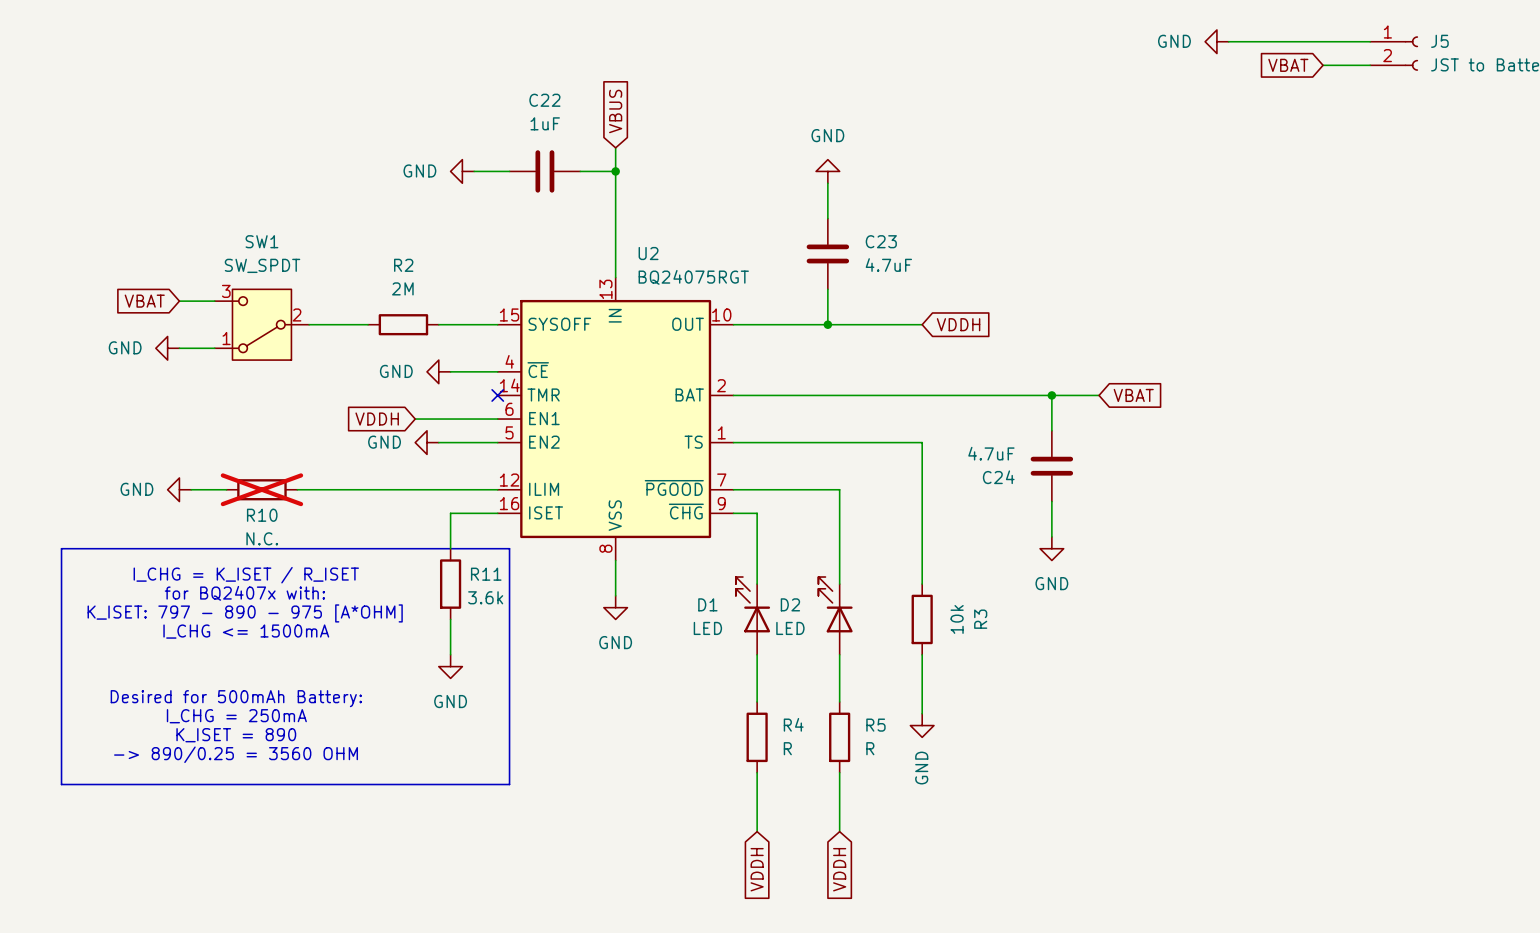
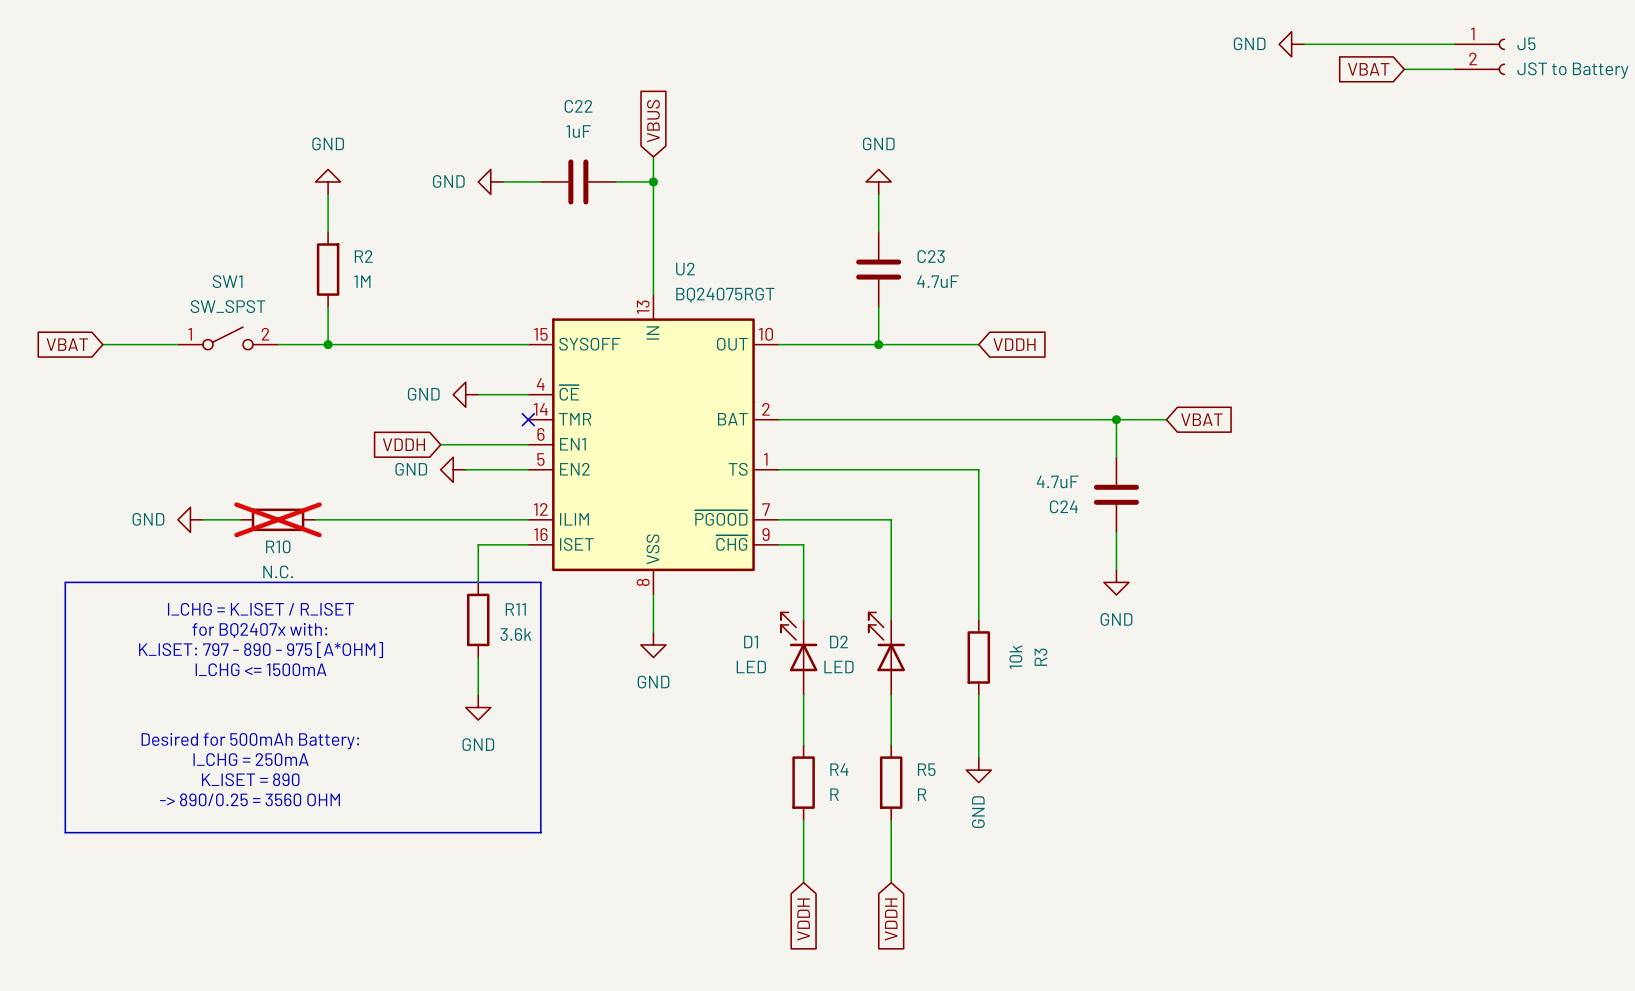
wire: none -> (328, 194) (328, 232)
SW1 name position: SW1 (261, 241) -> SW1 (227, 281)
SW1 value: SW_SPDT (262, 265) -> SW_SPST (228, 306)
R2 name position: R2 (403, 265) -> R2 (363, 256)
R2 value: 2M (402, 288) -> 1M (362, 281)
SW1 symbol: [214, 289, 310, 361] -> [177, 327, 279, 350]
wire: none -> (328, 307) (328, 344) (278, 344)
global label position: VBAT (144, 301) -> VBAT (67, 344)
wire: (179, 301) (214, 301) -> none
wire: none -> (102, 344) (177, 344)
junction: none -> (328, 344)
wire: none -> (390, 344) (465, 344)
R2 rotation: 0° (403, 324) -> 90° clockwise (328, 269)
R2 position: (403, 324) -> (328, 269)
power symbol rotation: 0° (167, 348) -> 90° clockwise (328, 181)
power symbol position: GND (167, 348) -> GND (328, 181)
wire: (179, 348) (214, 348) -> none

